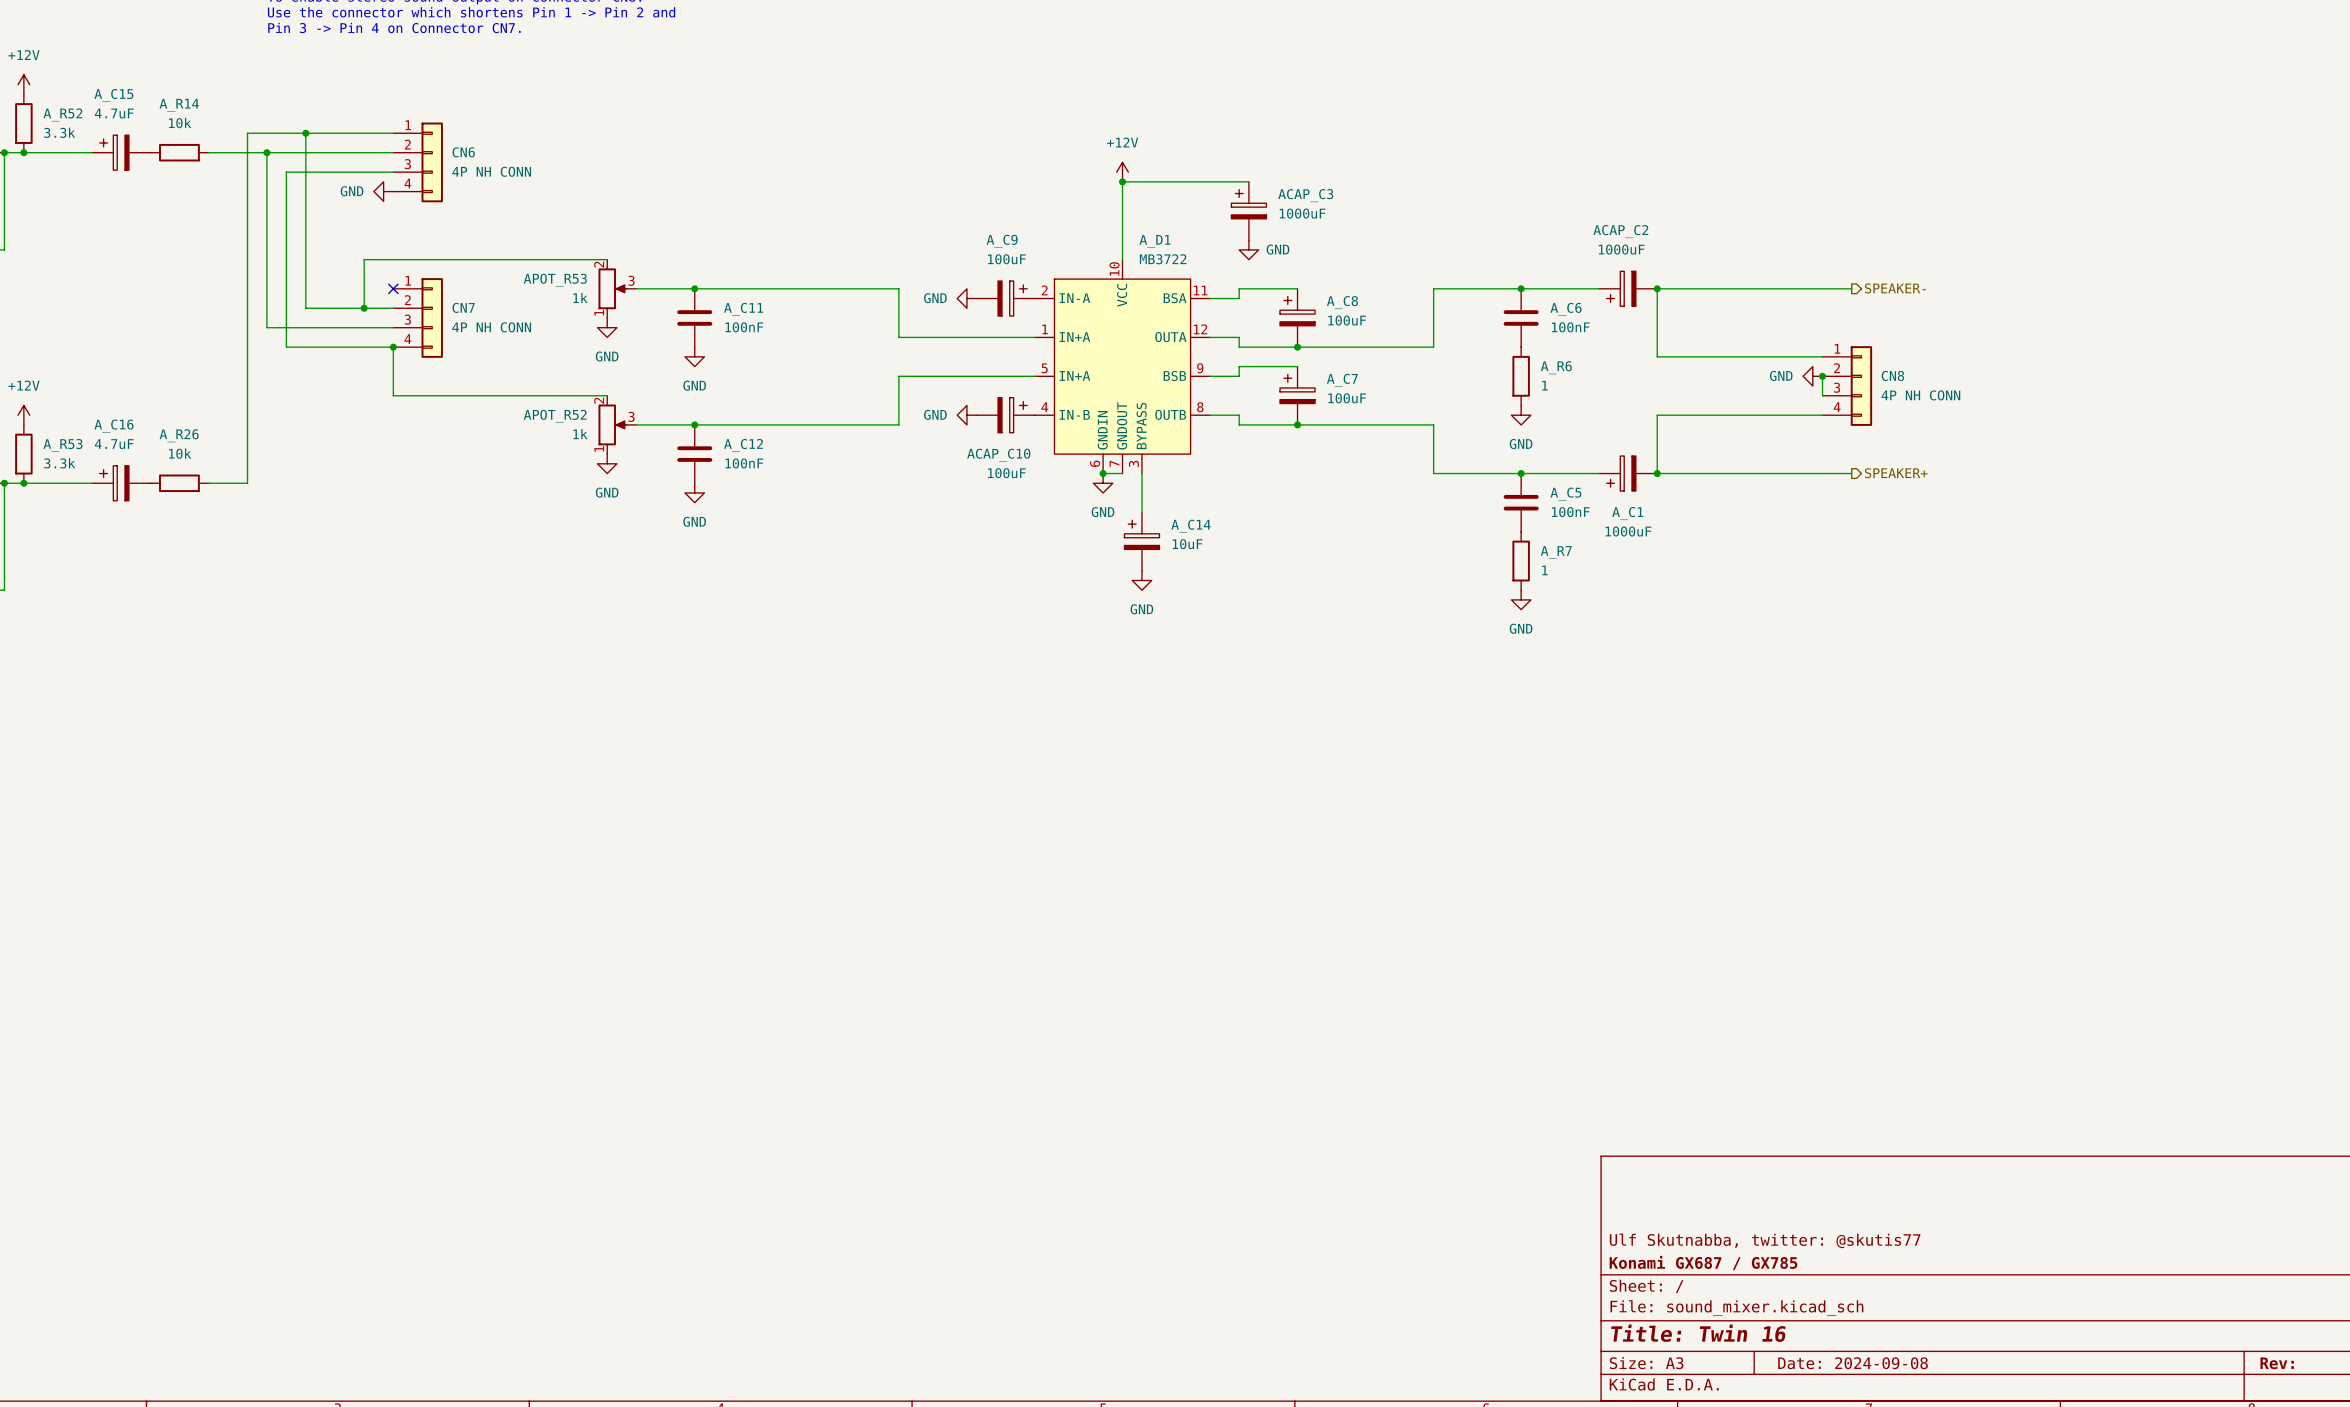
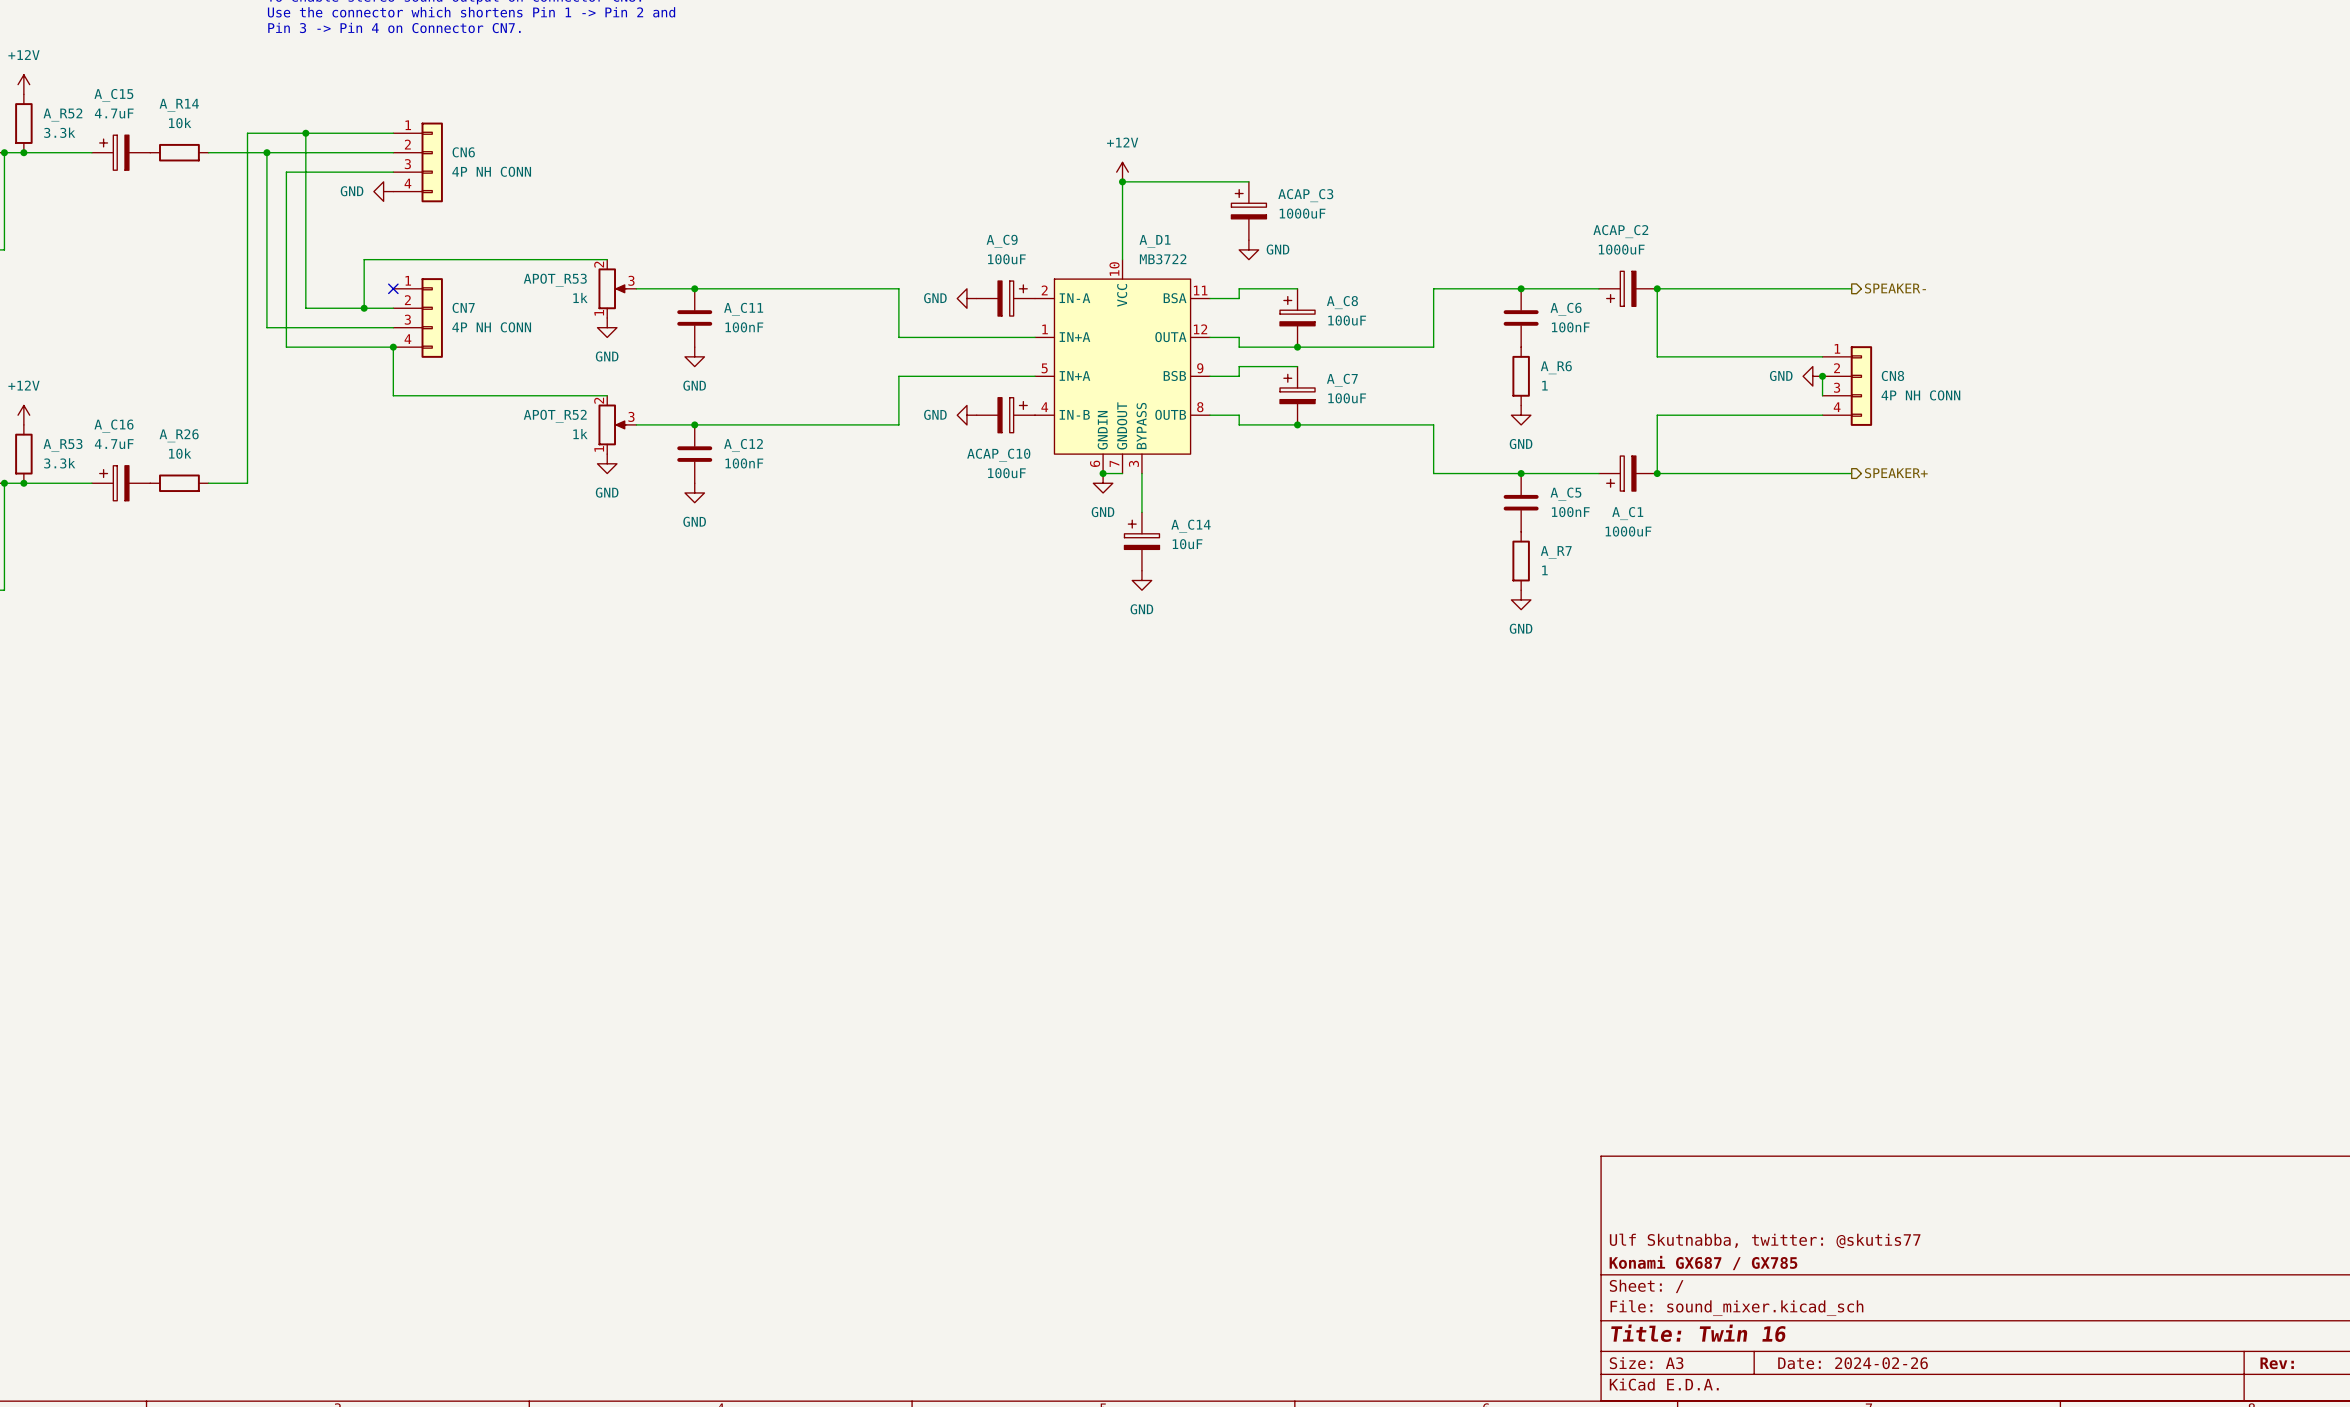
title block: Date: 2024-09-08 (1853, 1363) -> Date: 2024-02-26 (1853, 1363)

